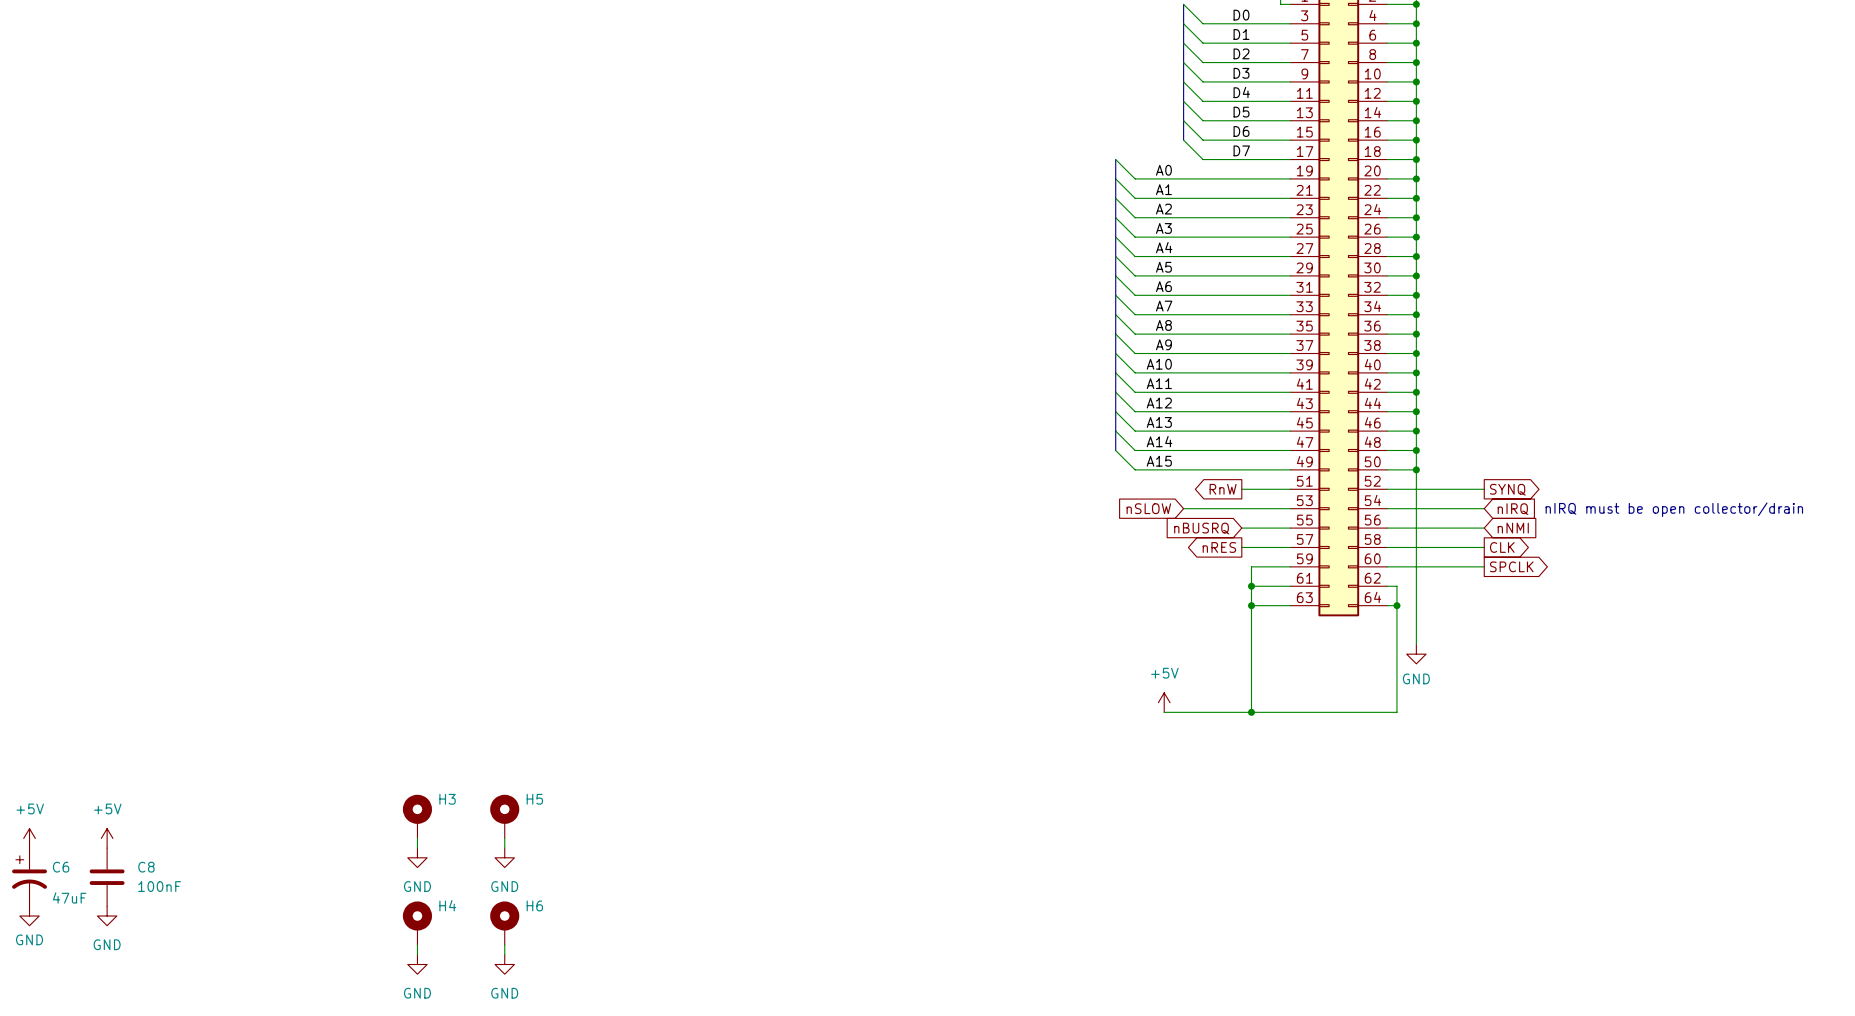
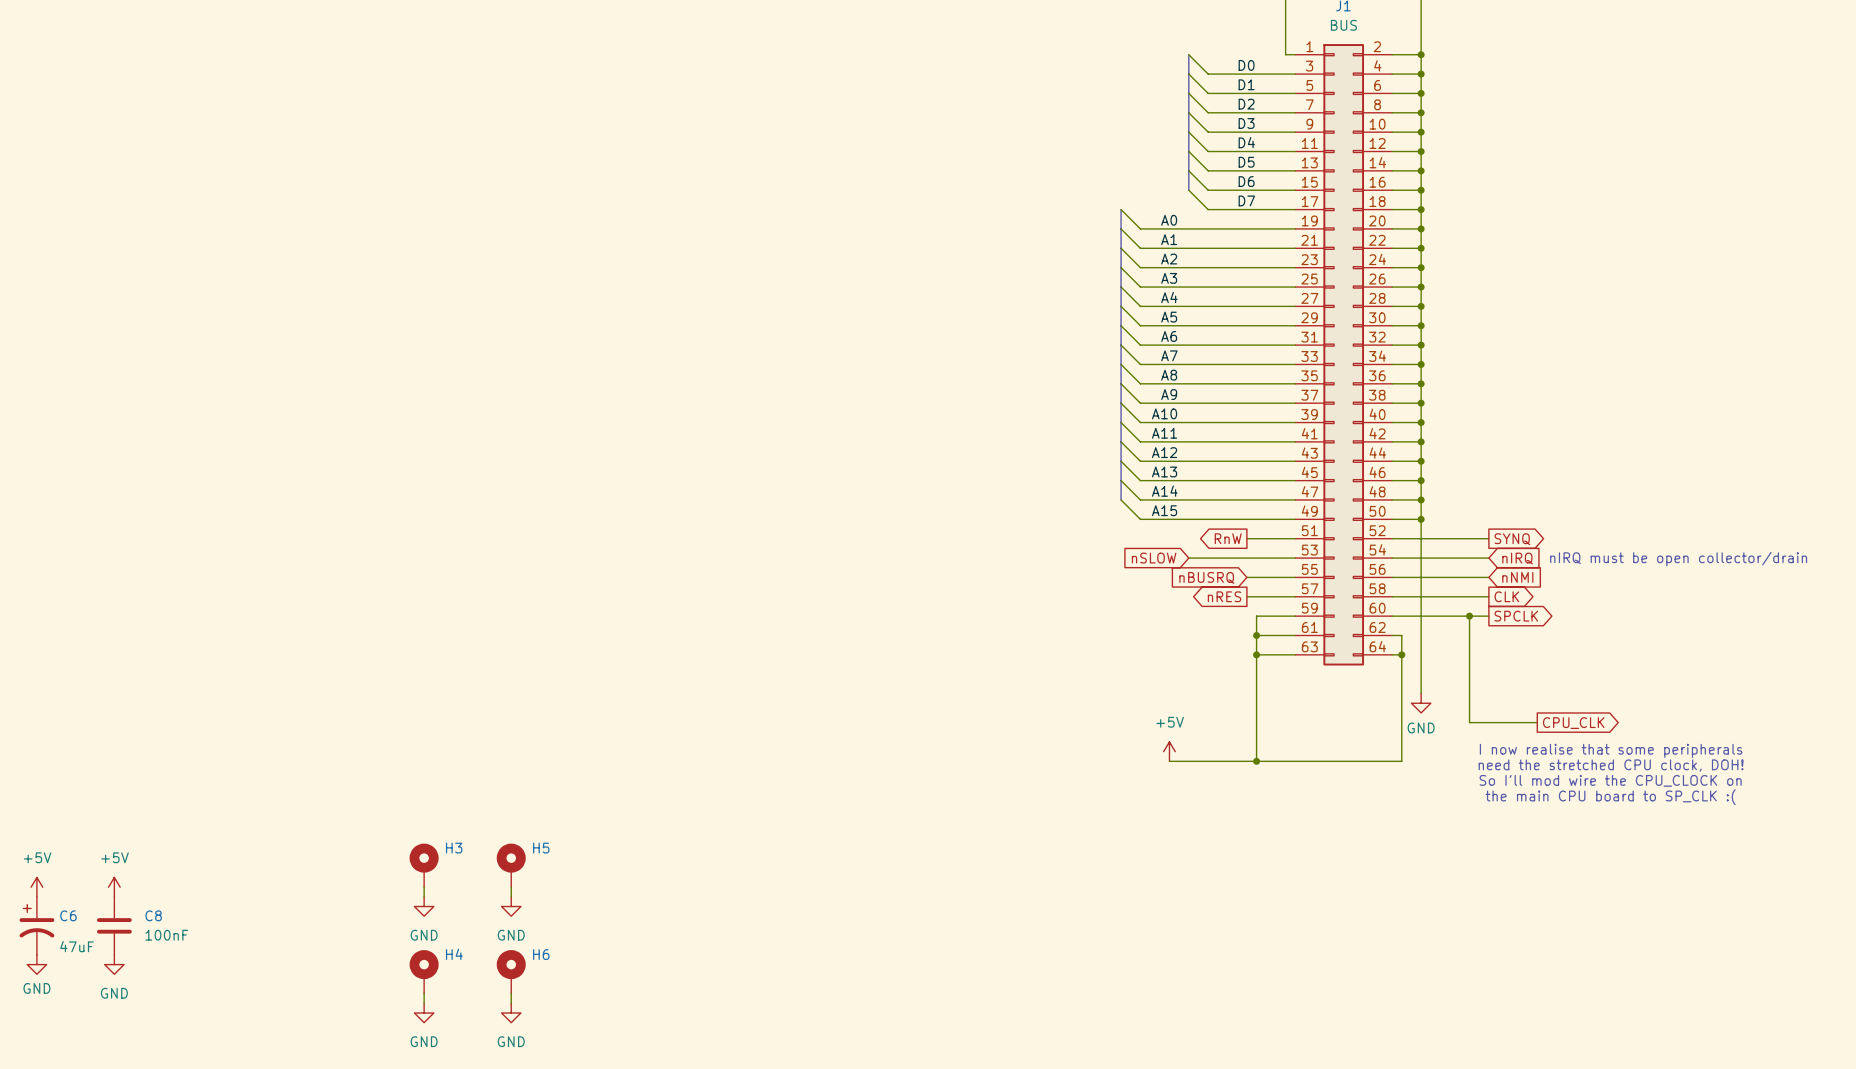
wire: none -> (1469, 616) (1469, 722) (1537, 722)
junction: none -> (1469, 616)
global label: none -> CPU_CLK (1573, 723)
text: none -> I now realise that some peripherals (1611, 750)
text: none -> need the stretched CPU clock, DOH! (1611, 765)
text: none -> So I'll mod wire the CPU_CLOCK on (1610, 780)
text: none -> the main CPU board to SP_CLK :( (1610, 797)

